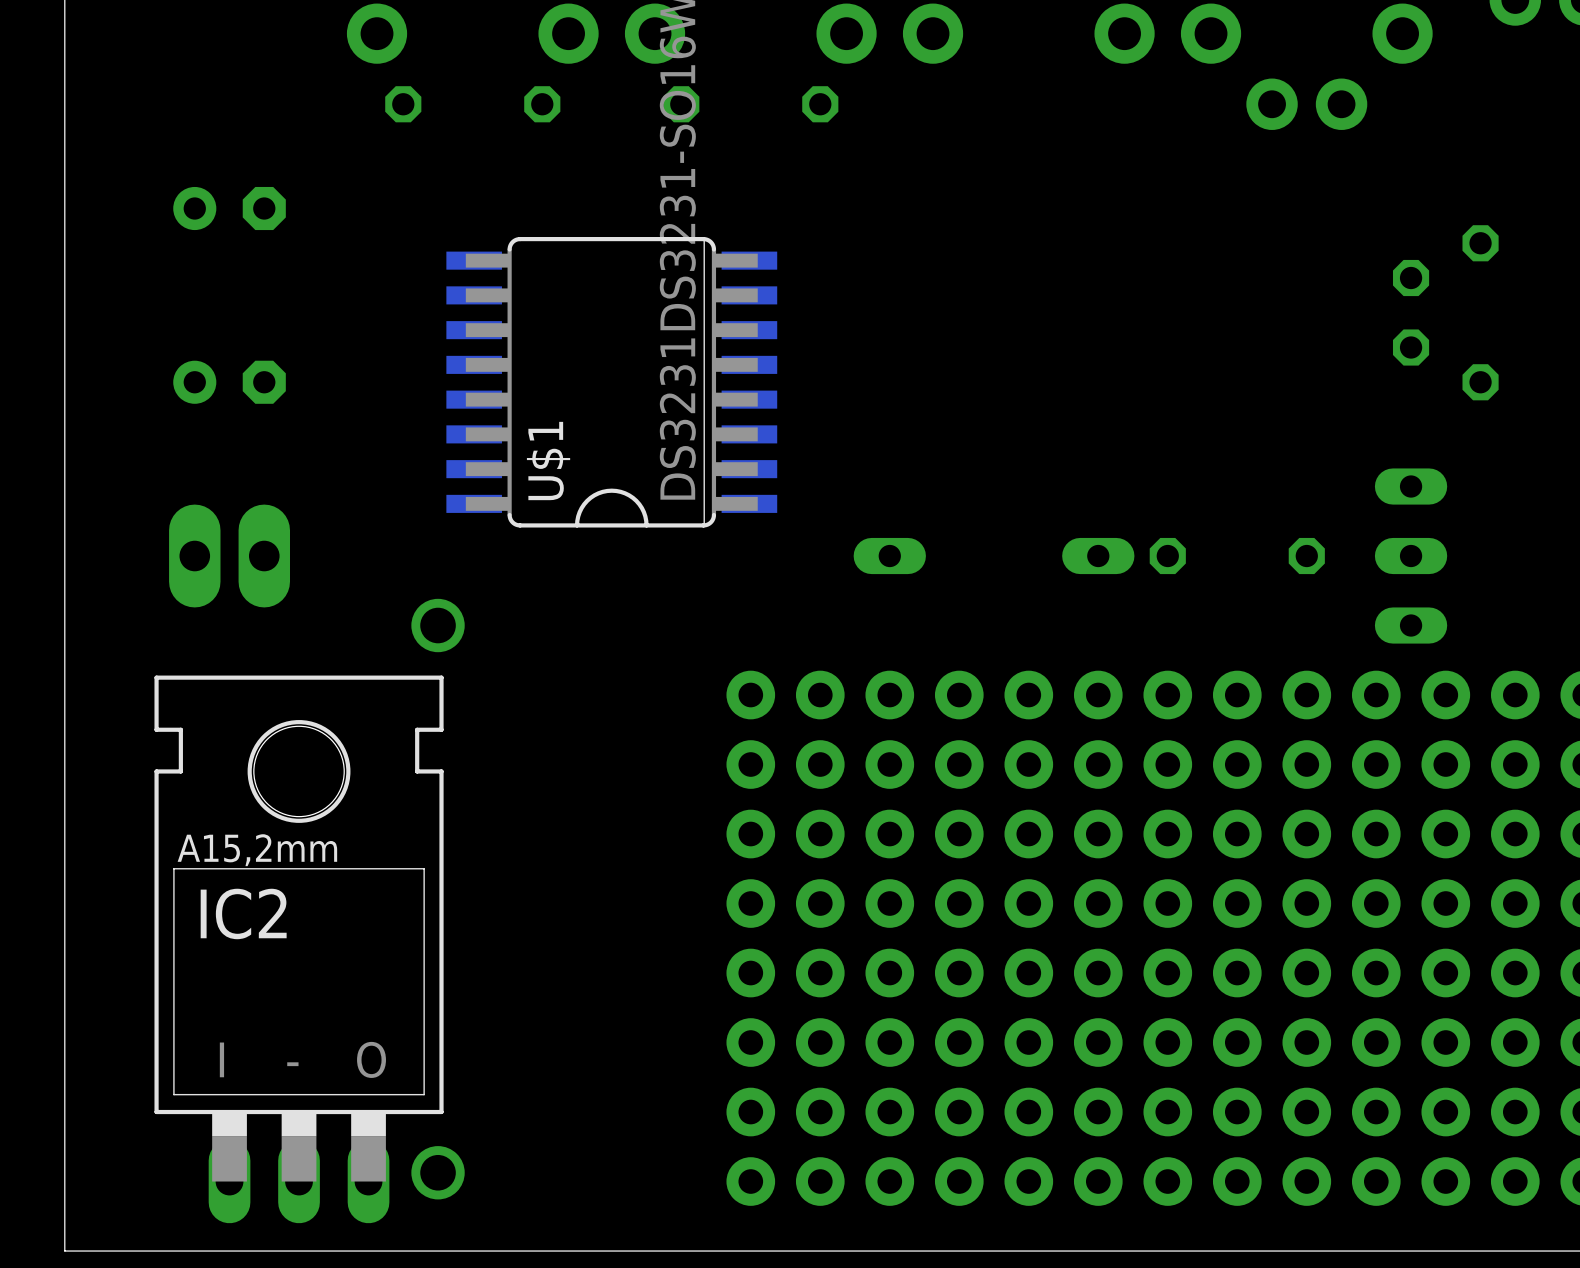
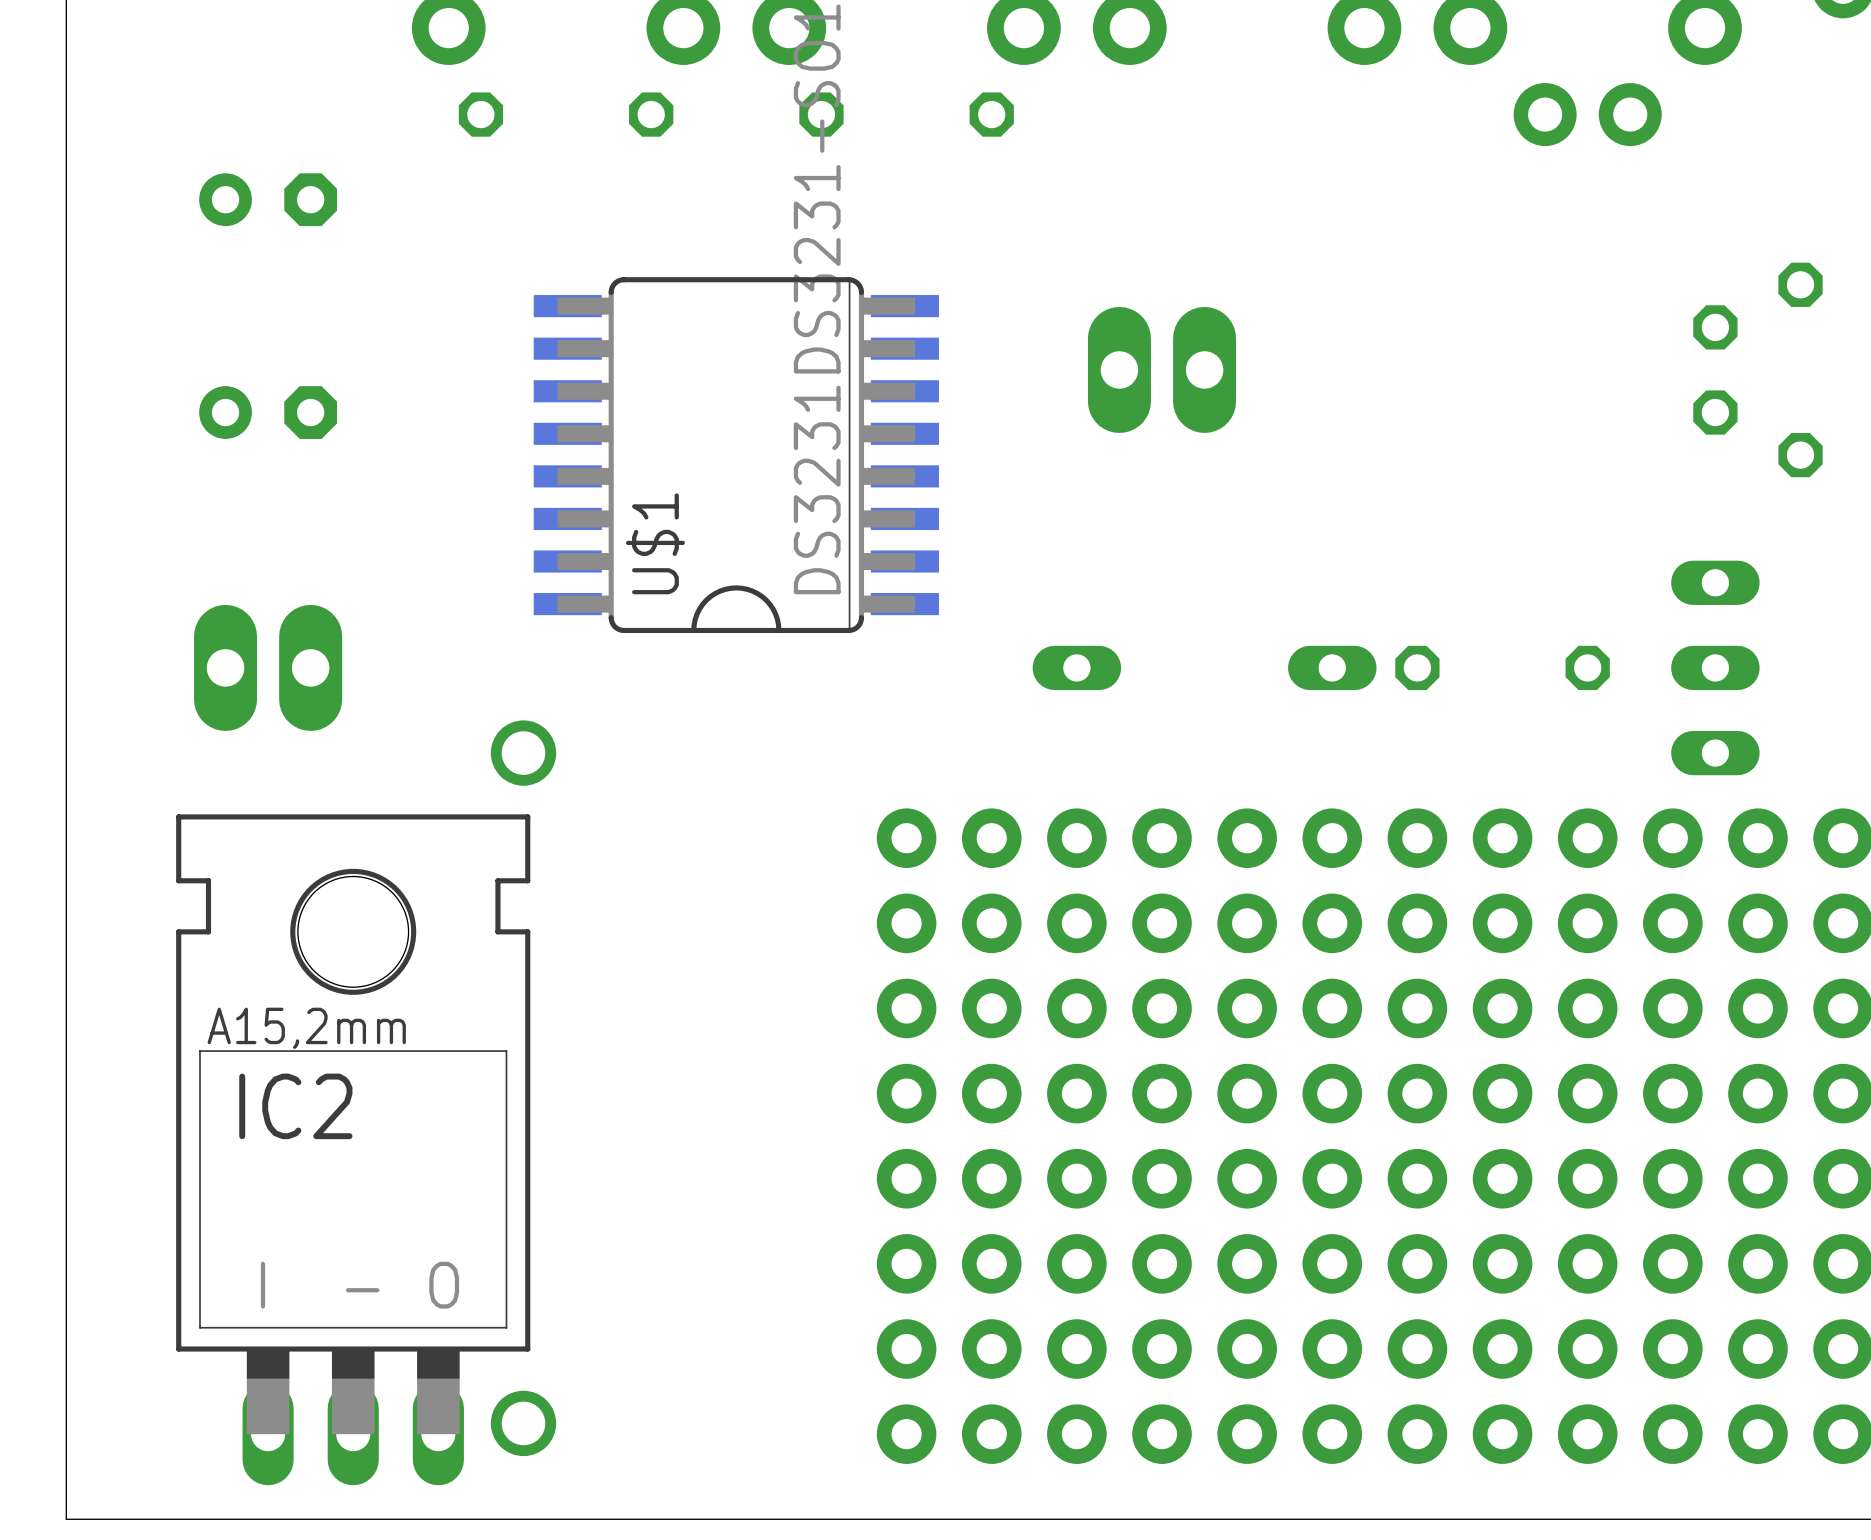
part position: (229, 208) -> (268, 199)
part: none -> (1162, 369)
part position: (229, 382) -> (268, 412)

